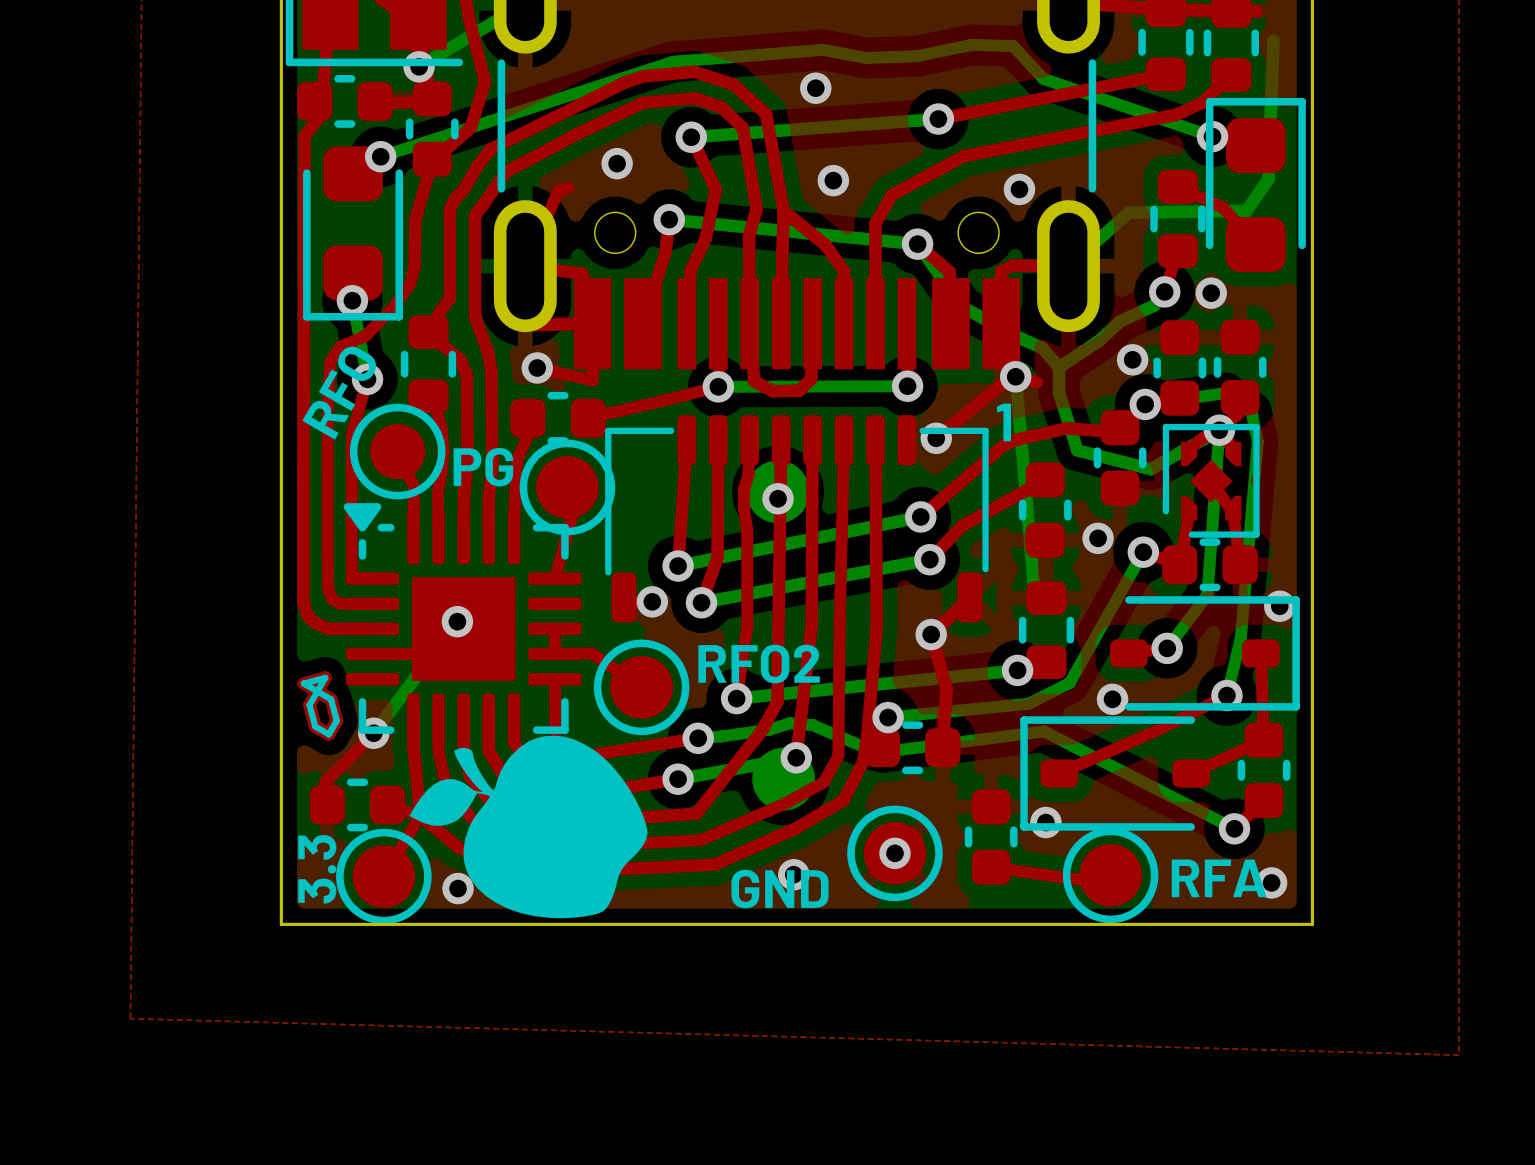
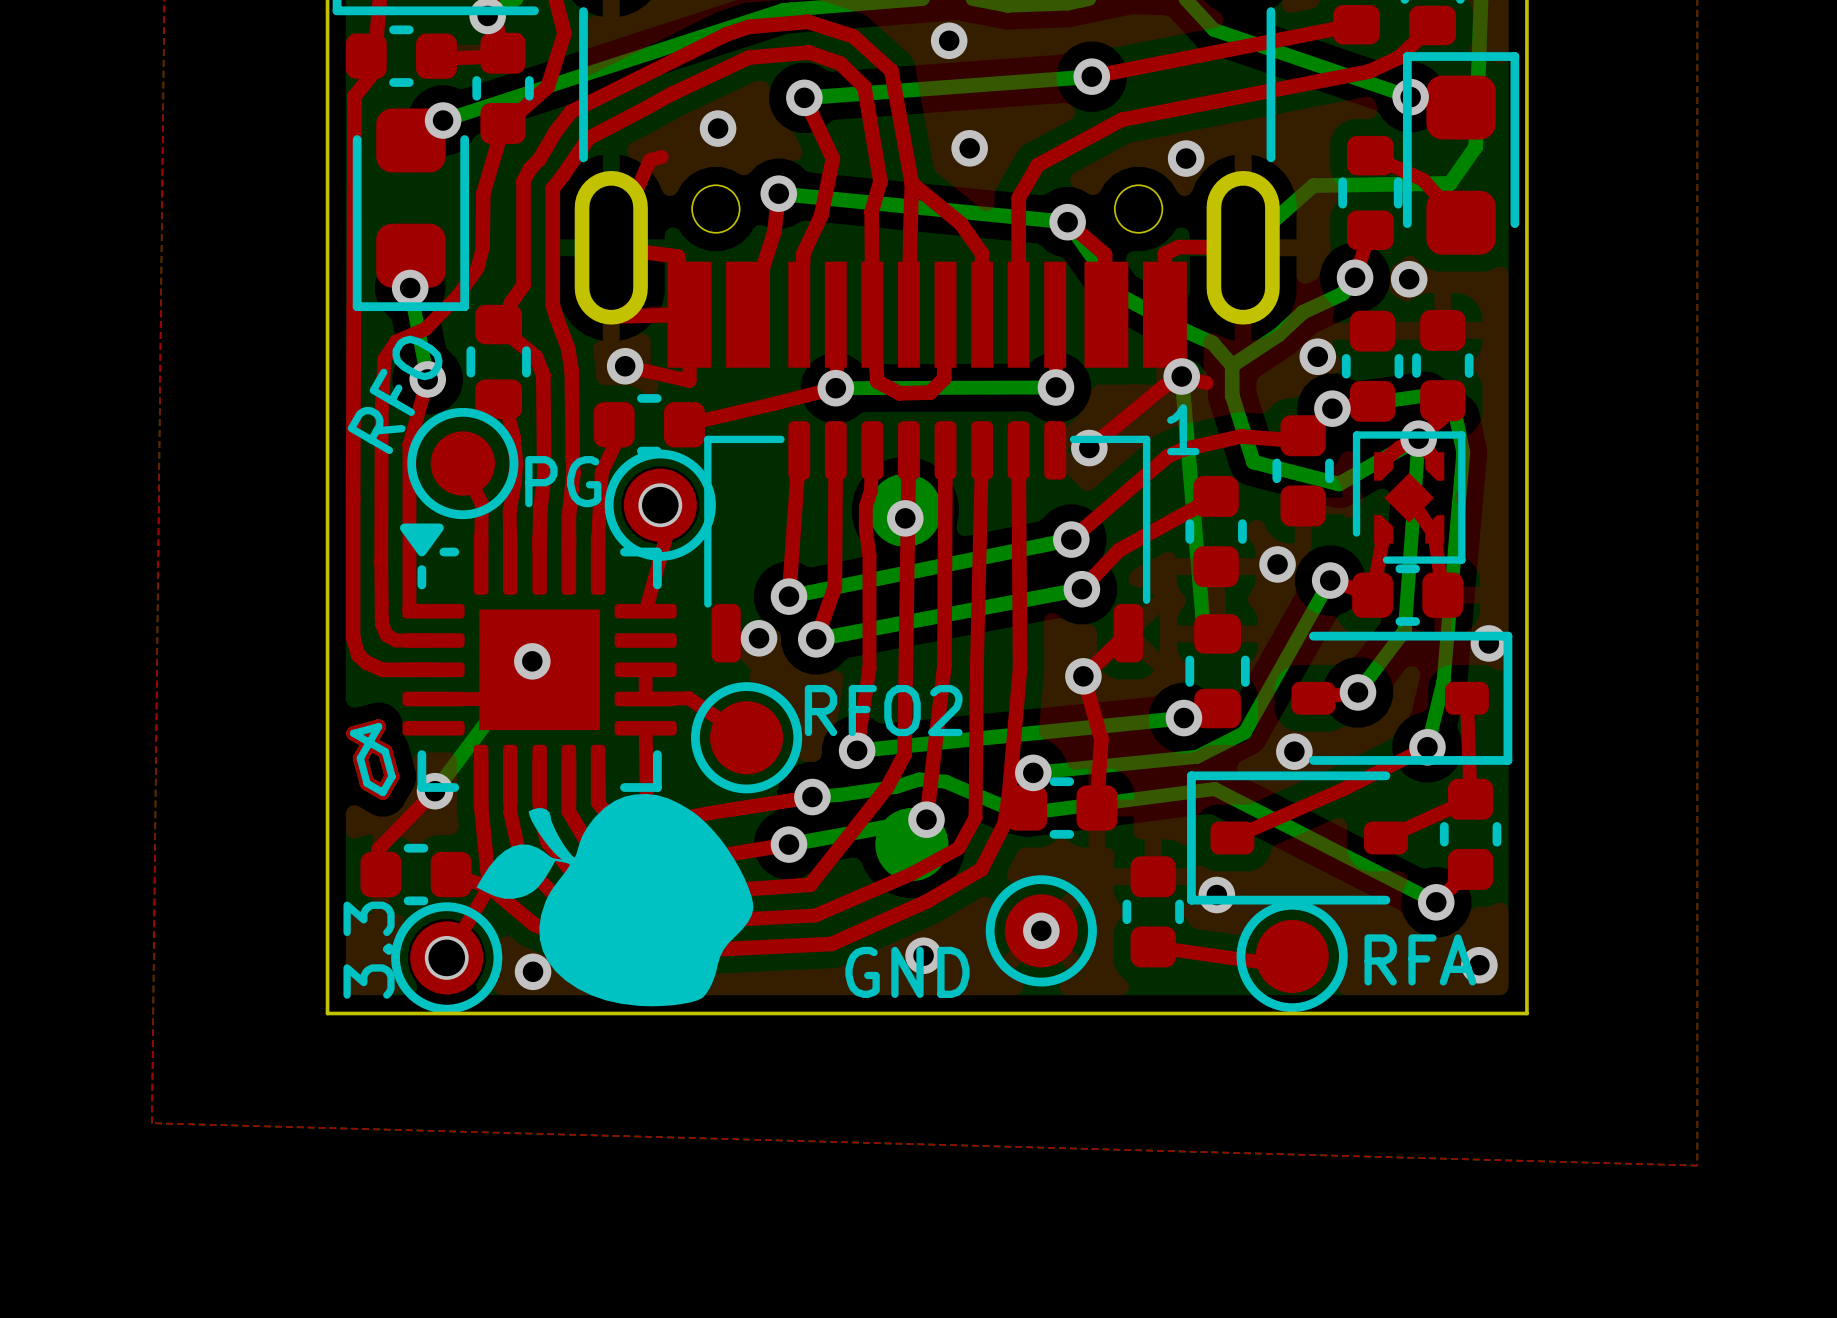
via: none -> (660, 505)
via: none -> (446, 957)

